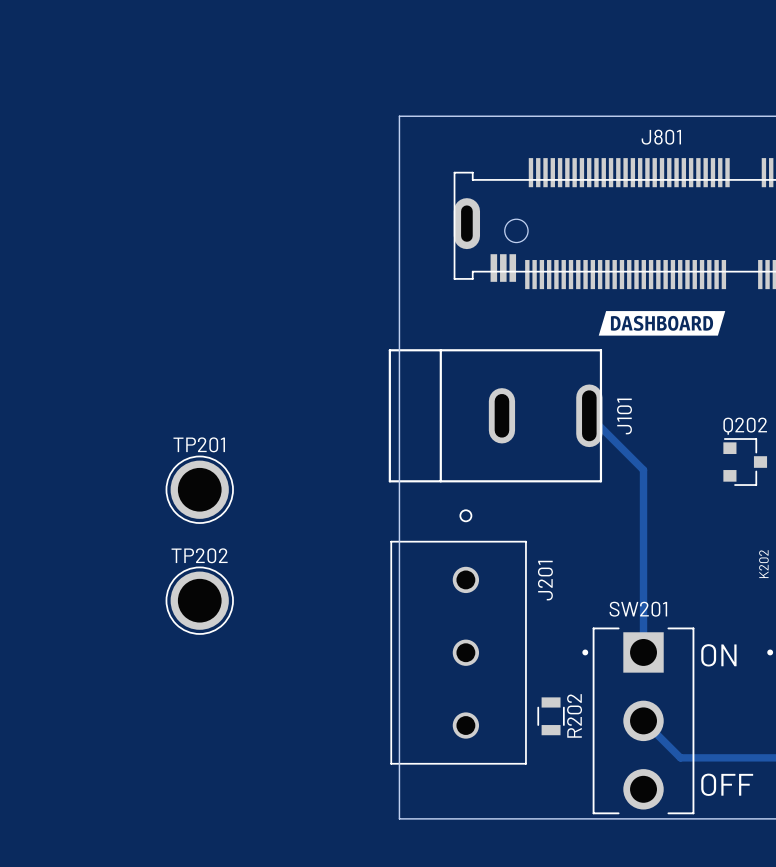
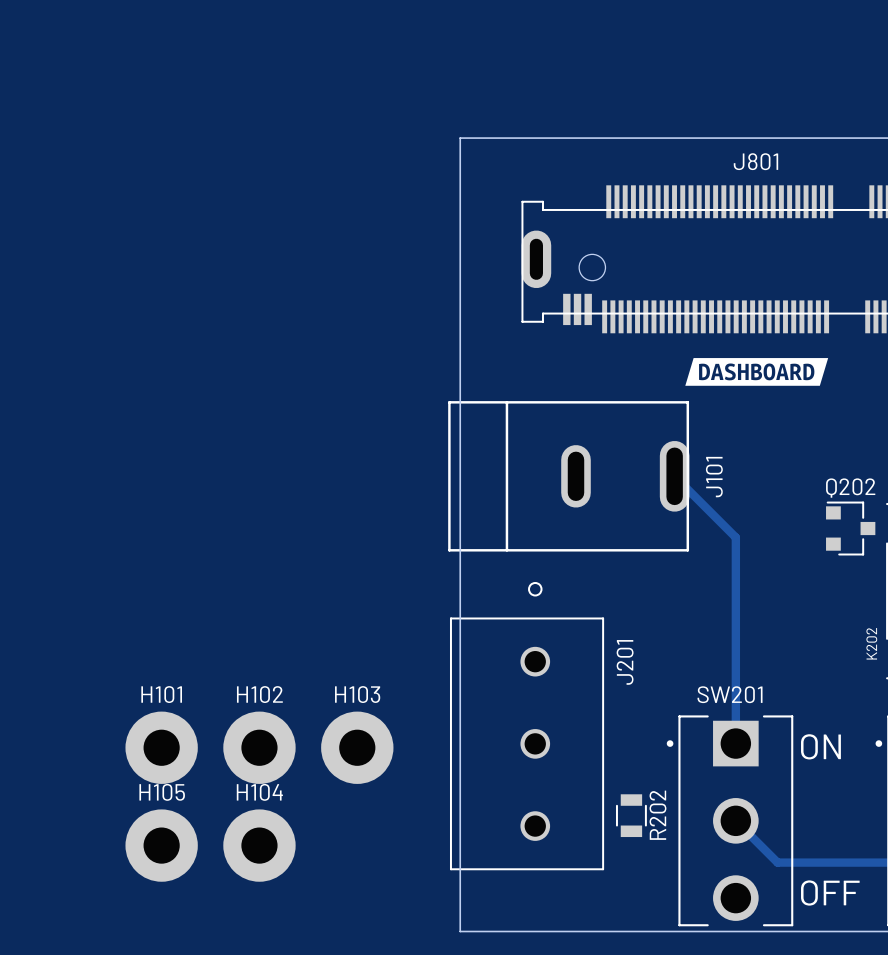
TP201: (199, 489) -> none
TP202: (199, 600) -> none
H101: none -> (161, 747)
H102: none -> (259, 747)
H103: none -> (357, 747)
H105: none -> (161, 845)
H104: none -> (259, 845)

